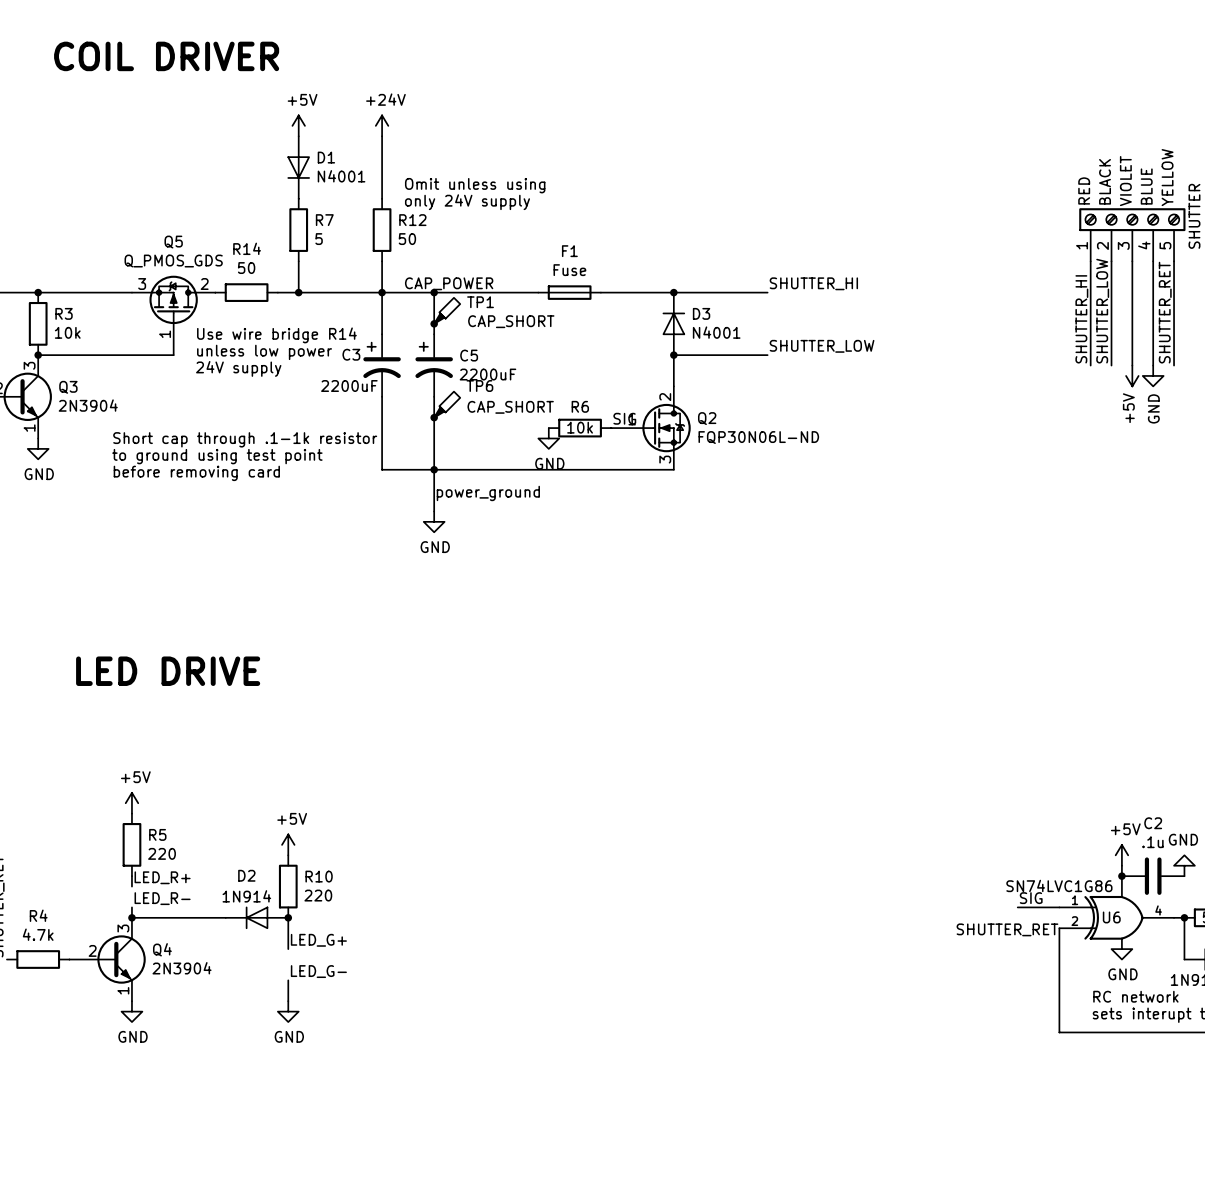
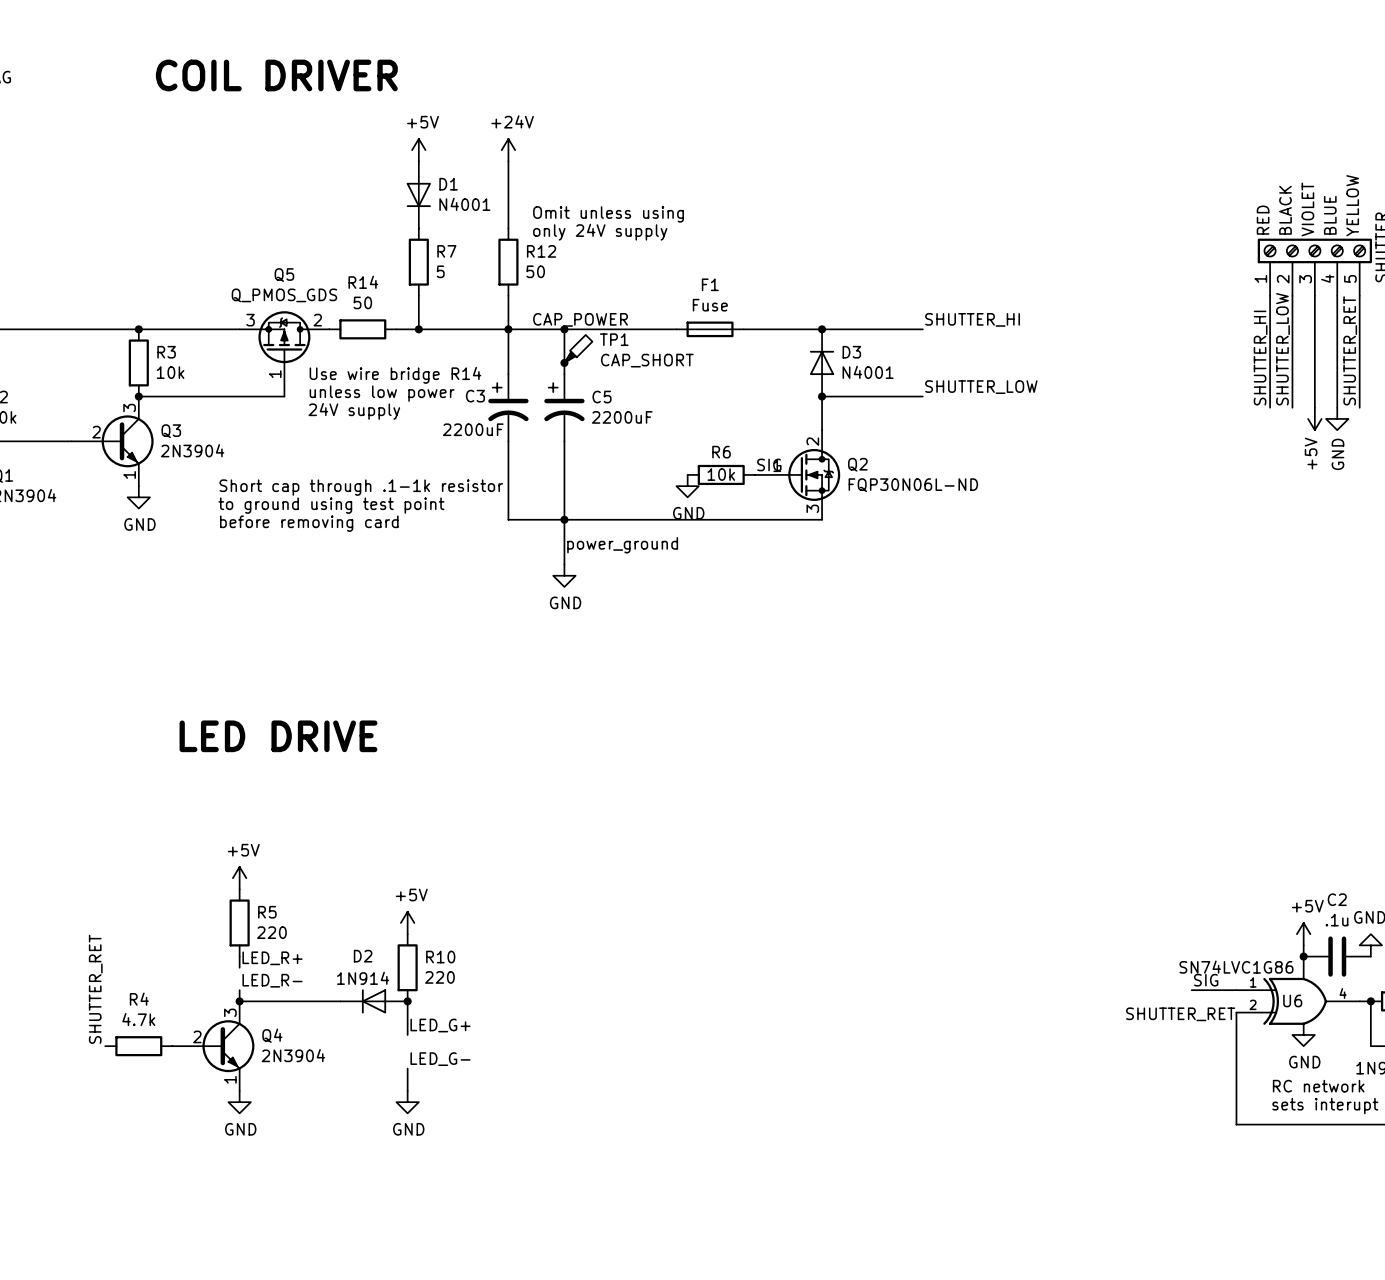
TP6: CAP_SHORT (447, 404) -> none
junction: (434, 417) -> none

